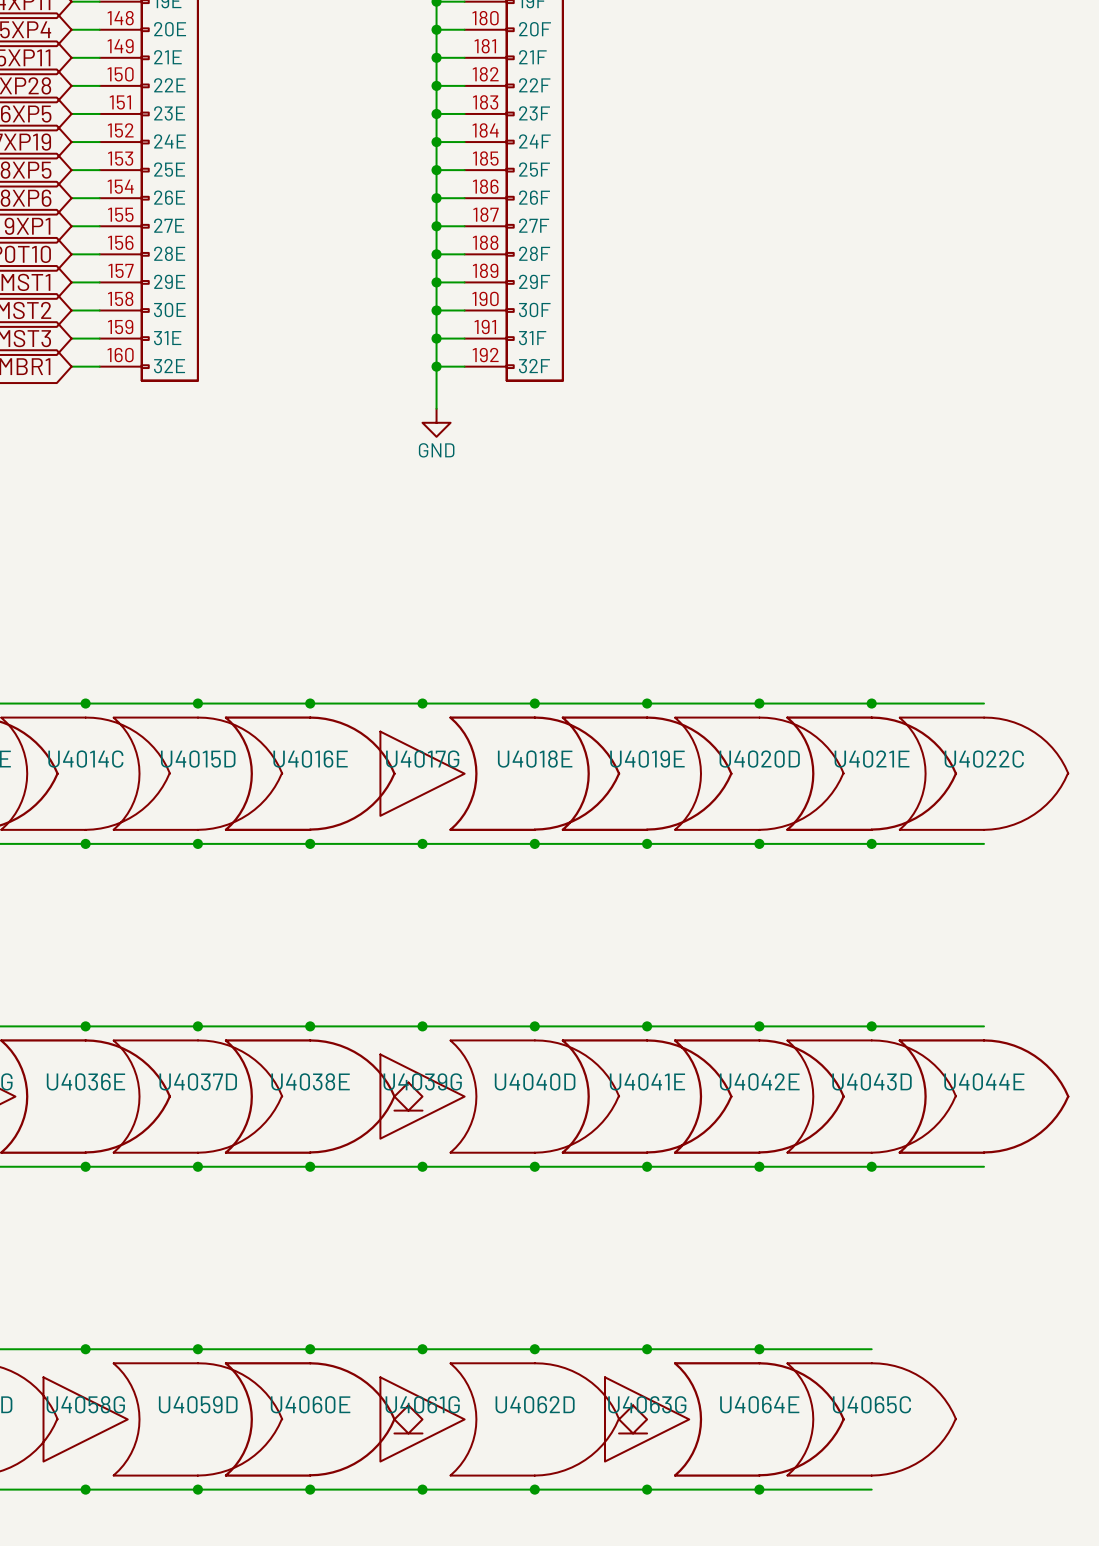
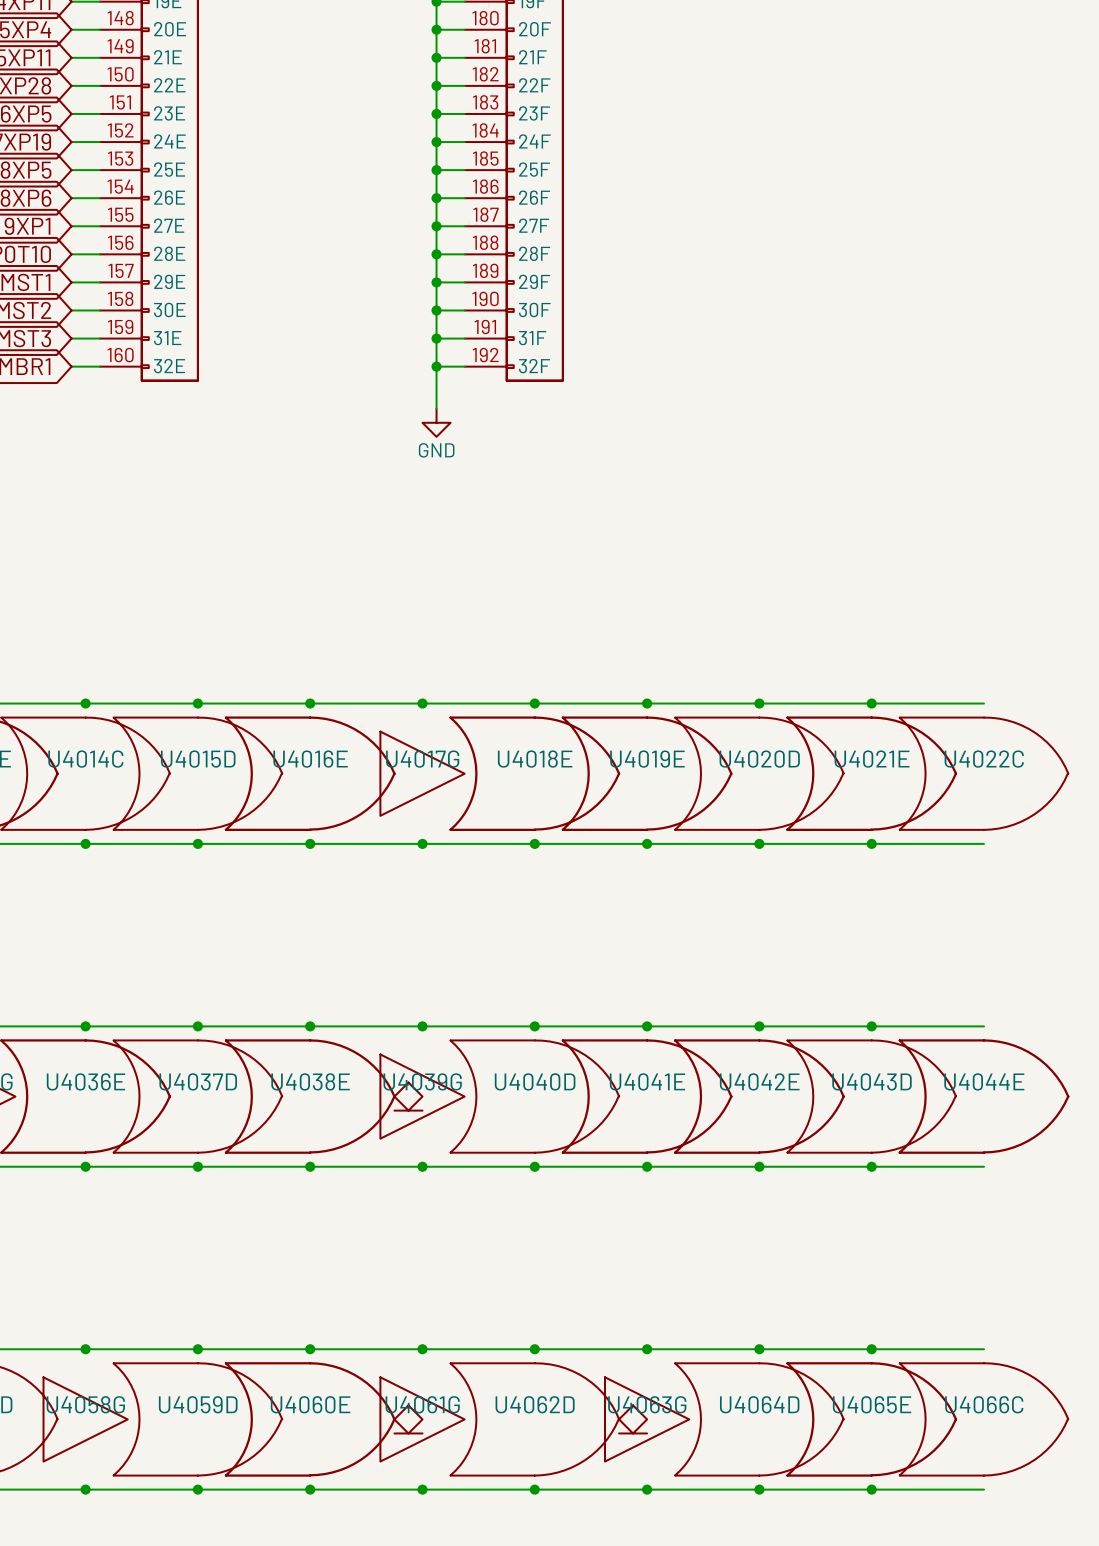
wire: none -> (871, 1349) (983, 1349)
junction: none -> (871, 1349)
U4064E: (759, 1419) -> none
U4064D: none -> (759, 1419)
U4065C: (871, 1419) -> none
U4065E: none -> (871, 1419)
U4066C: none -> (984, 1419)
wire: none -> (871, 1489) (983, 1489)
junction: none -> (871, 1489)

